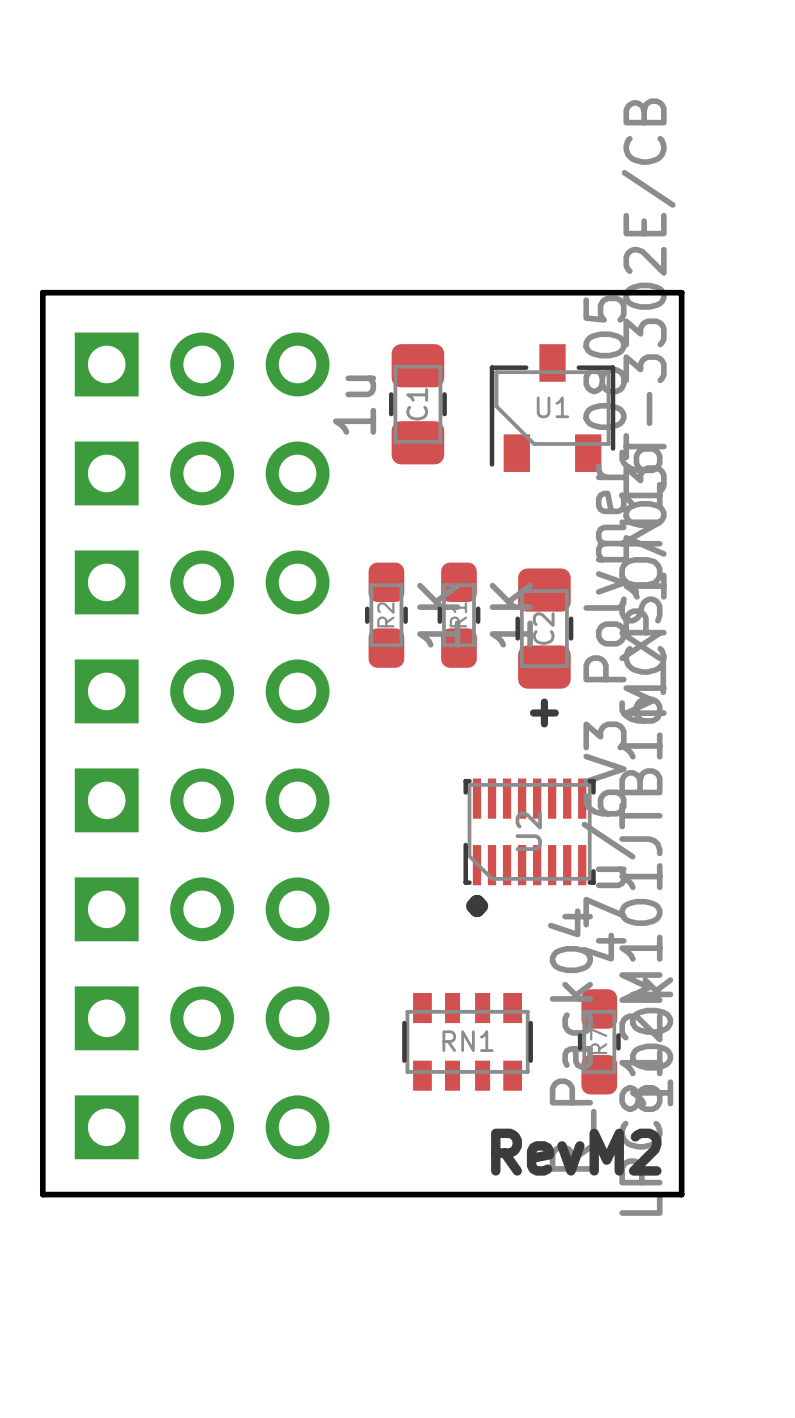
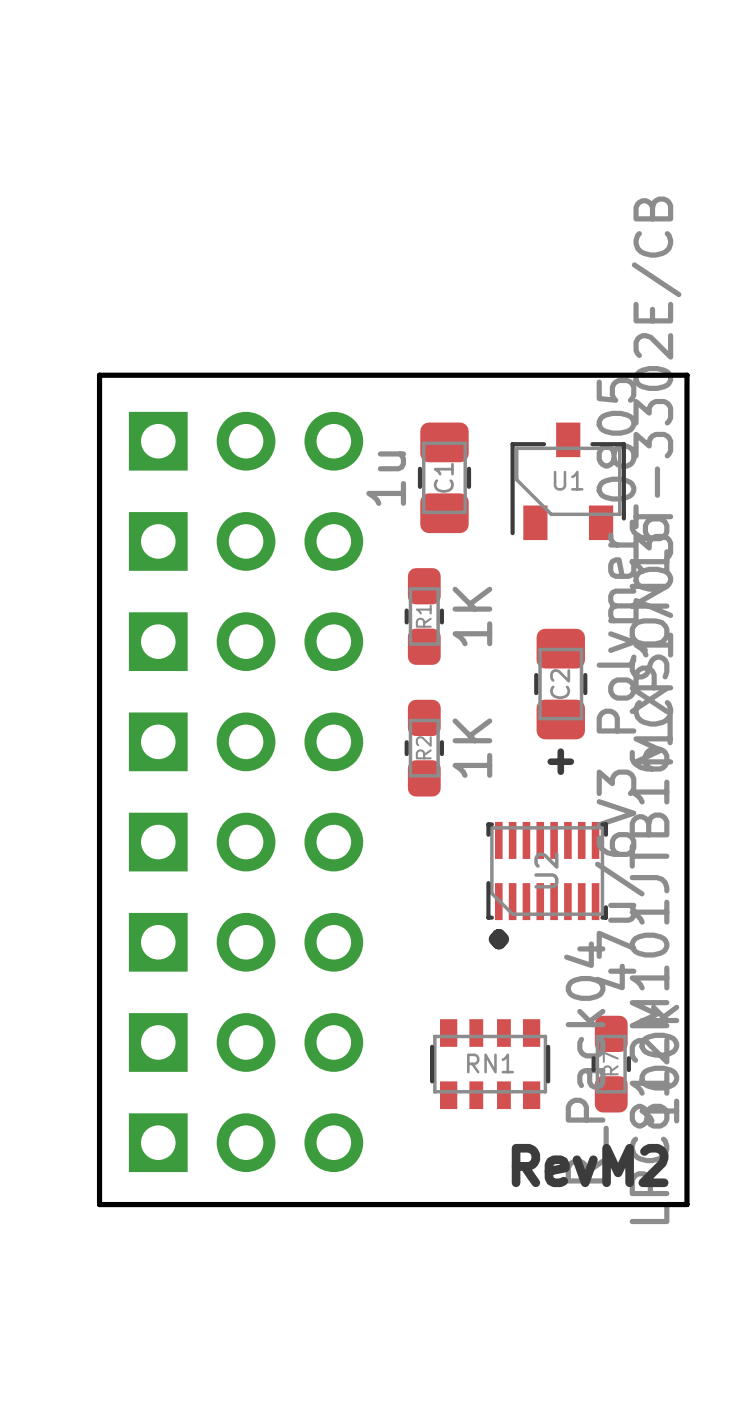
R2 position: (386, 615) -> (424, 748)
R1 position: (458, 615) -> (424, 616)

